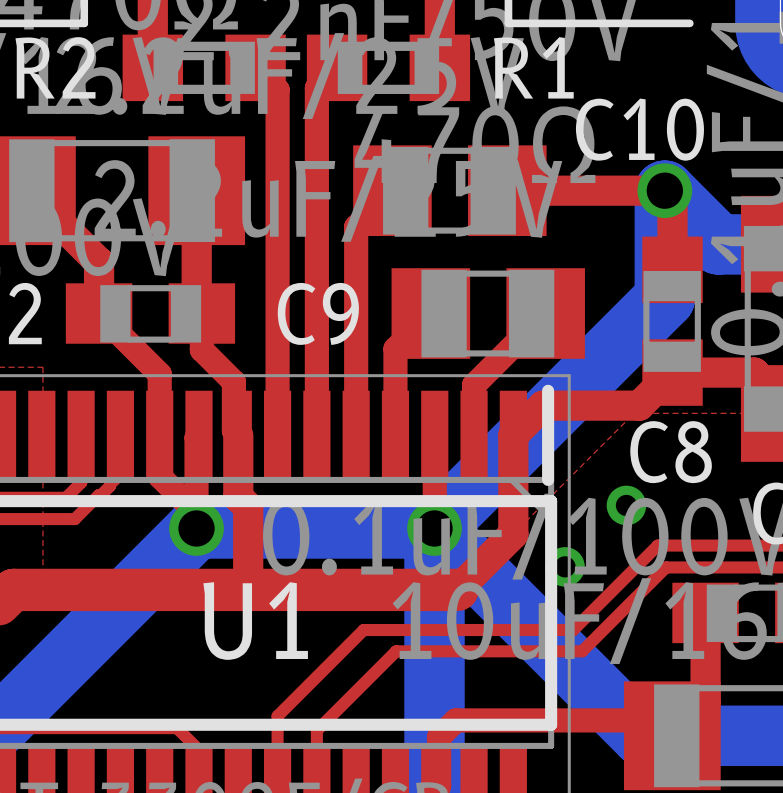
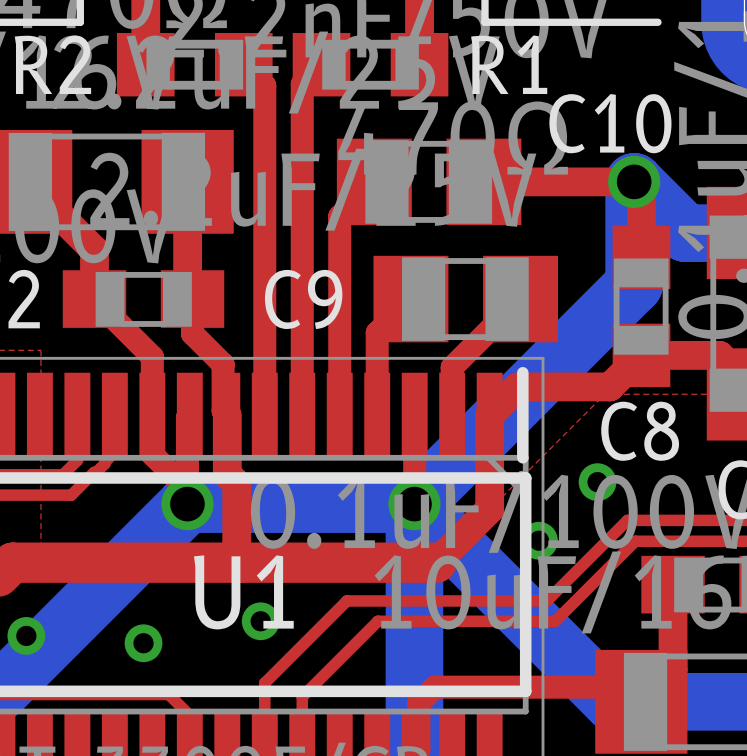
via: none -> (260, 621)
via: none -> (26, 635)
via: none -> (143, 643)

